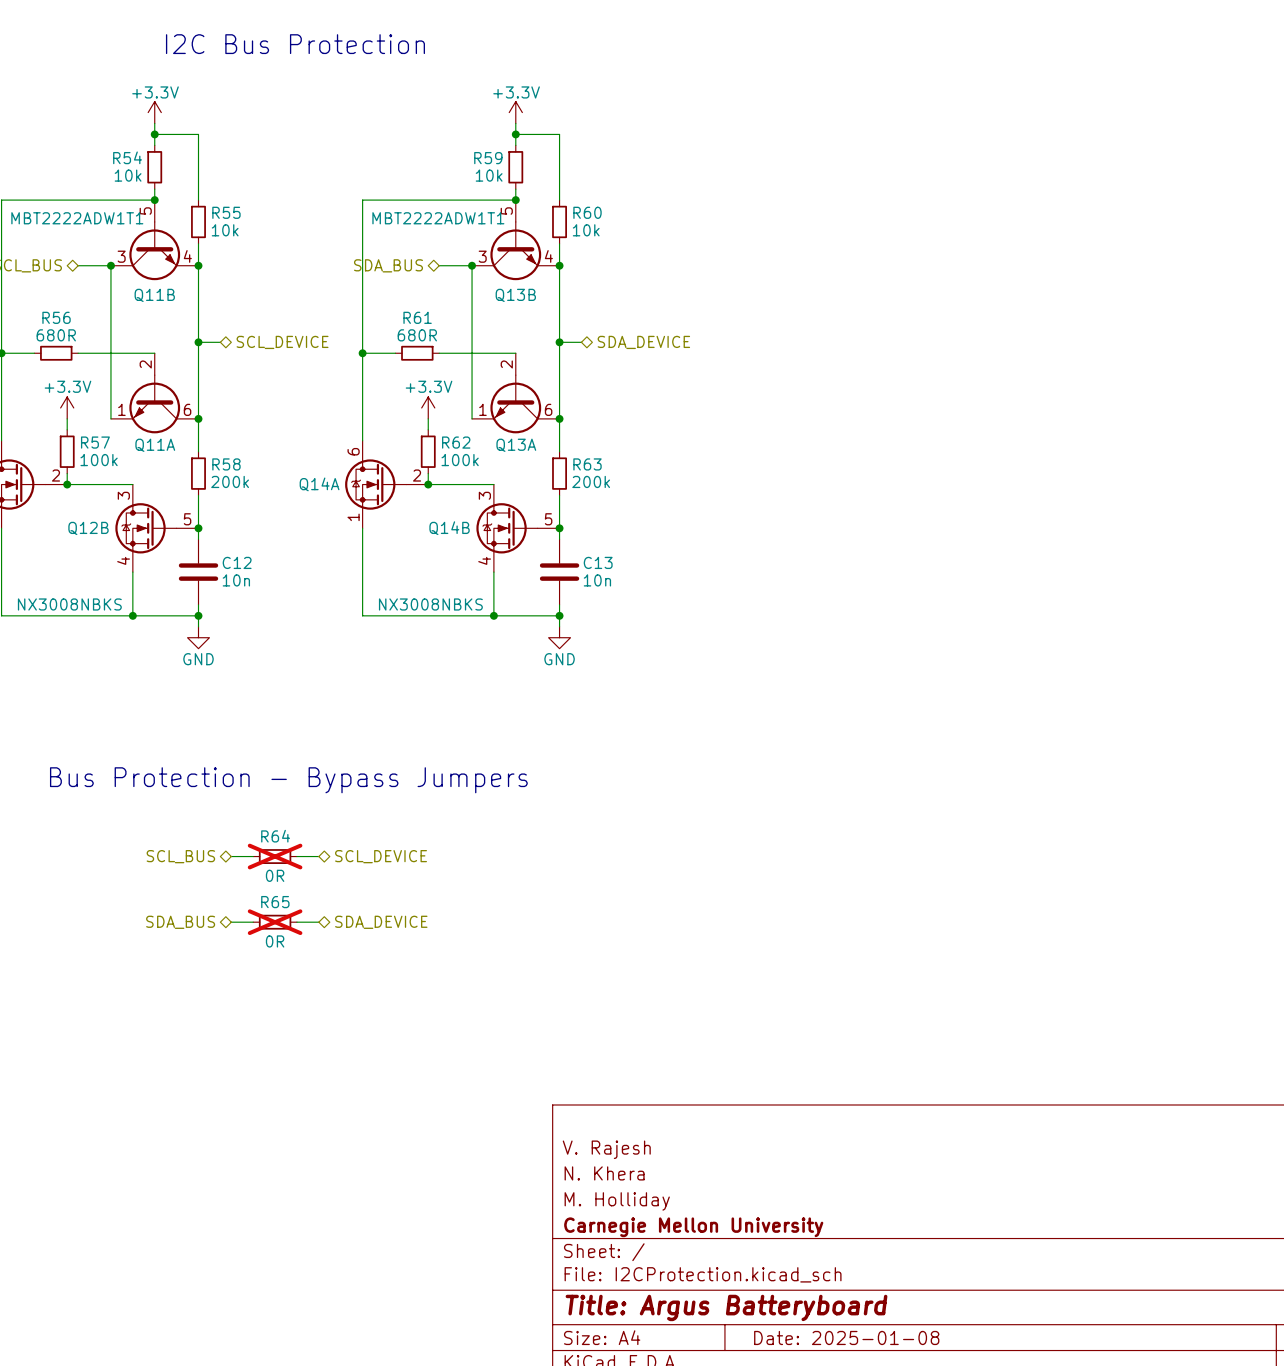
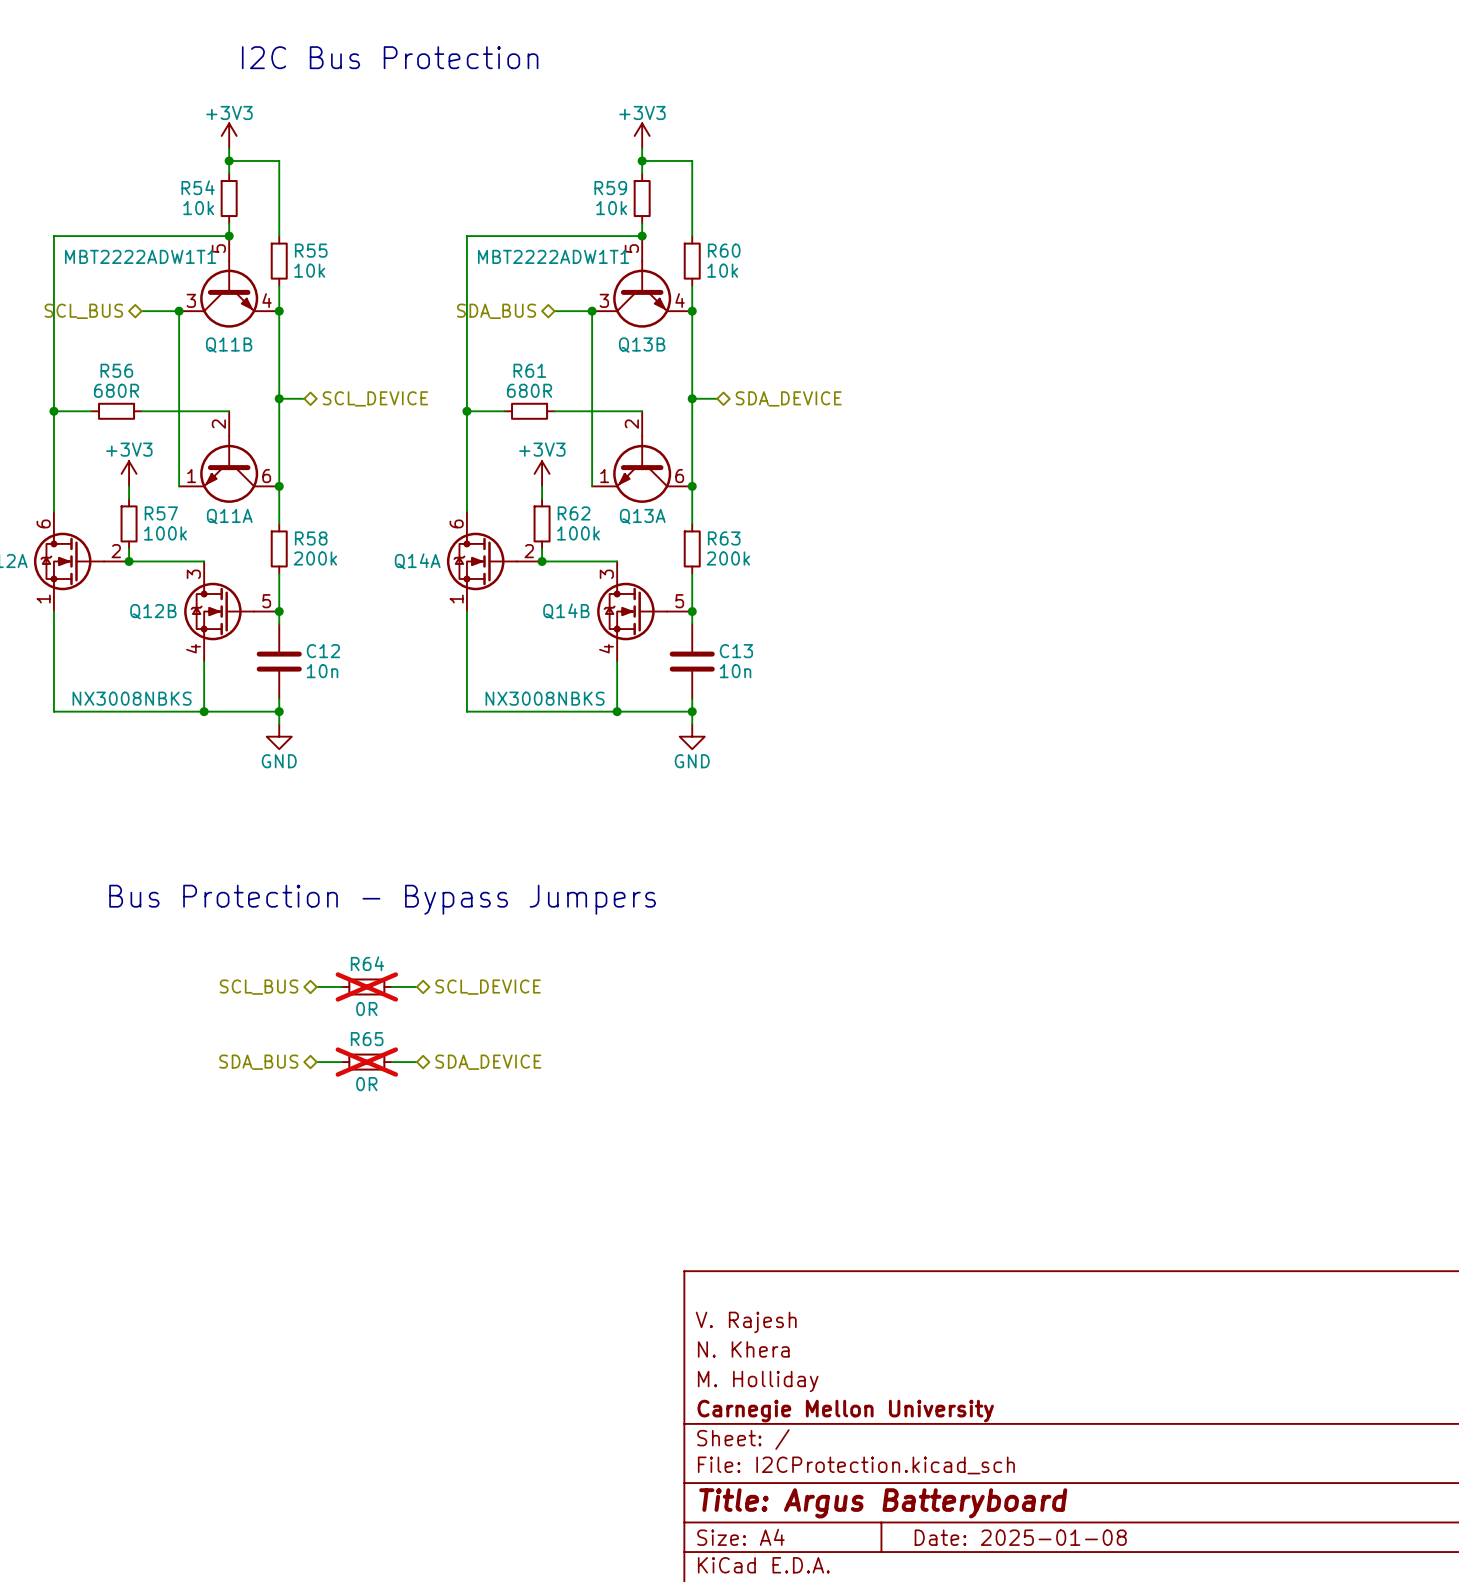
power symbol: +3.3V (154, 112) -> +3V3 (229, 135)
power symbol: +3.3V (515, 112) -> +3V3 (642, 135)
power symbol: +3.3V (67, 407) -> +3V3 (129, 473)
power symbol: +3.3V (428, 407) -> +3V3 (542, 473)

